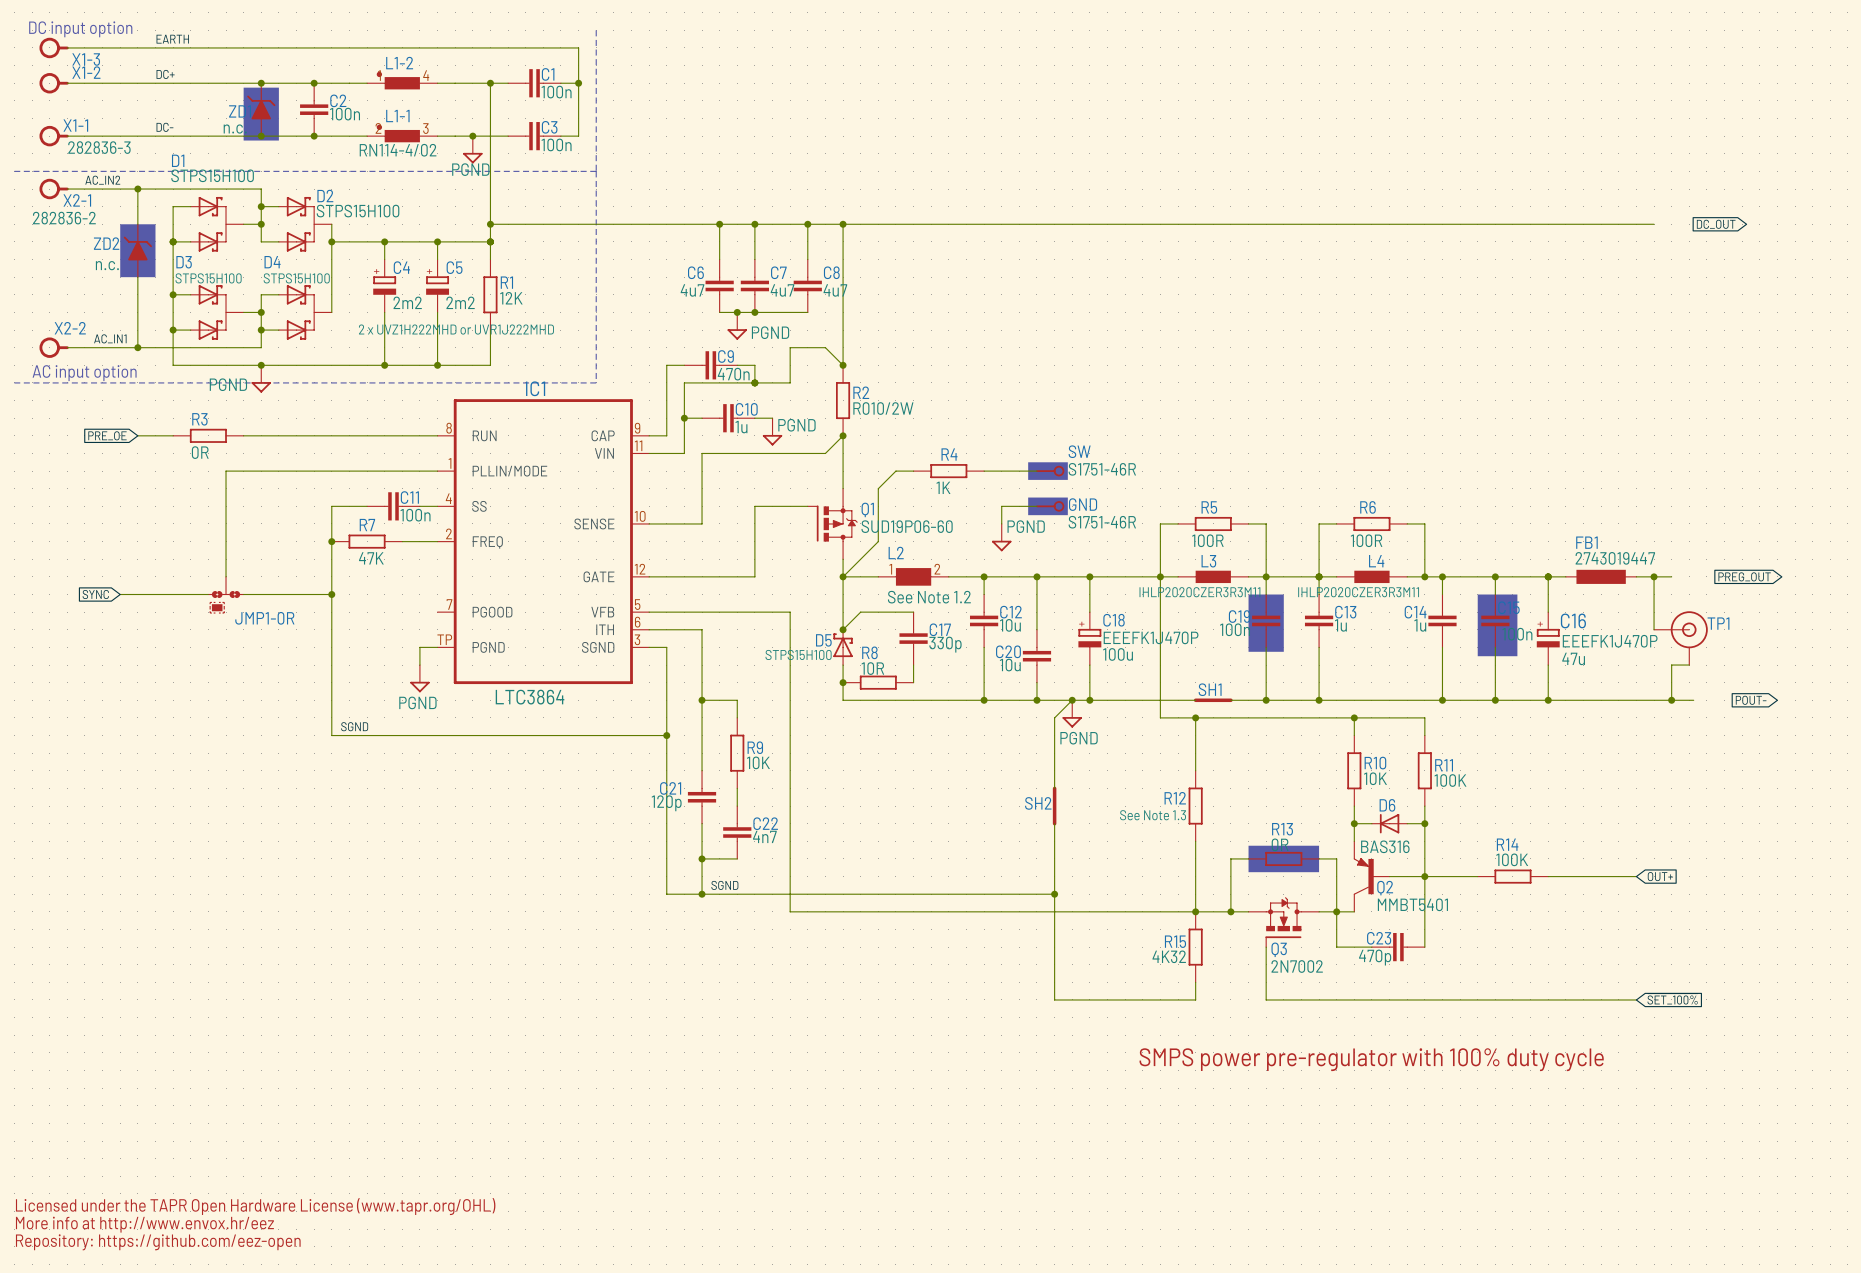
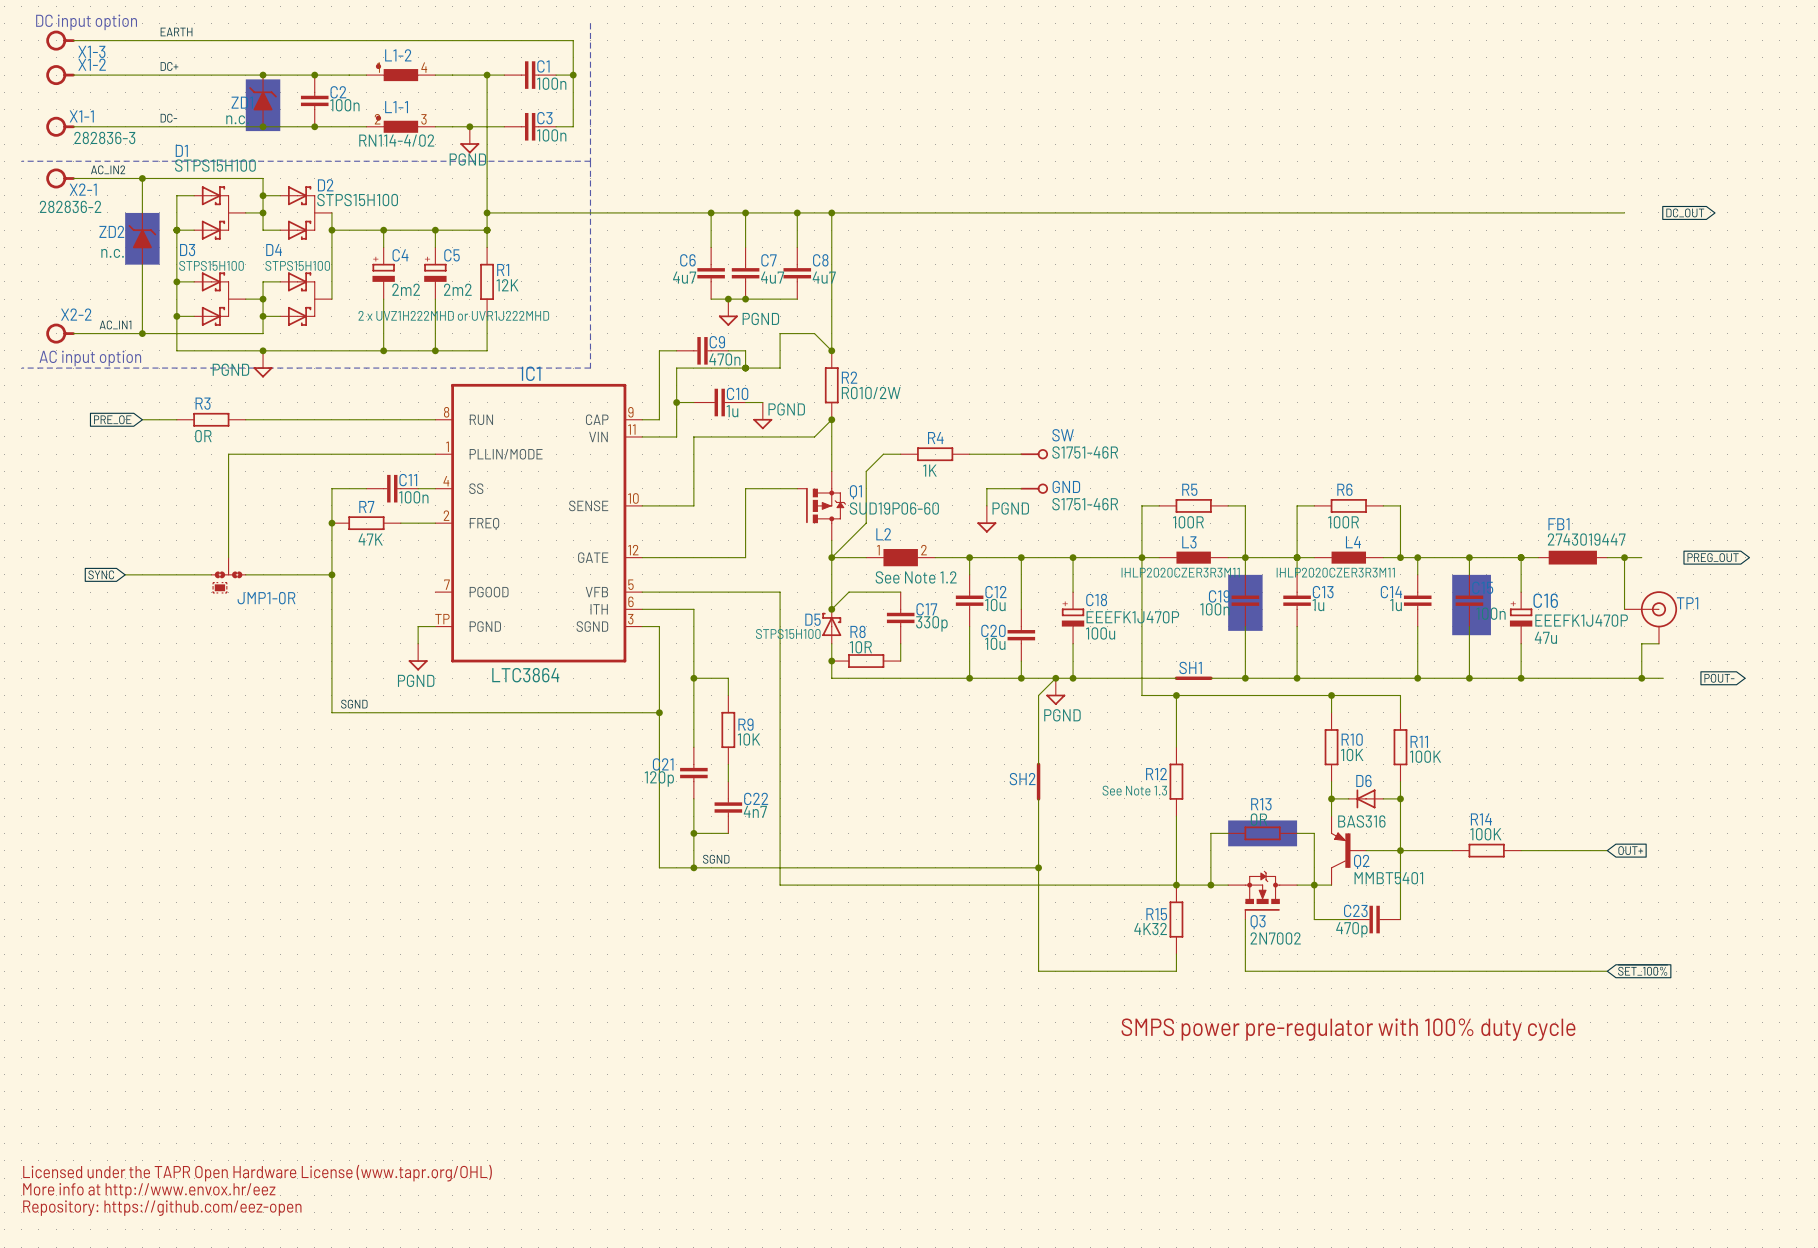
drawing: [1028, 462, 1068, 480] -> none
drawing: [1028, 497, 1068, 516] -> none

